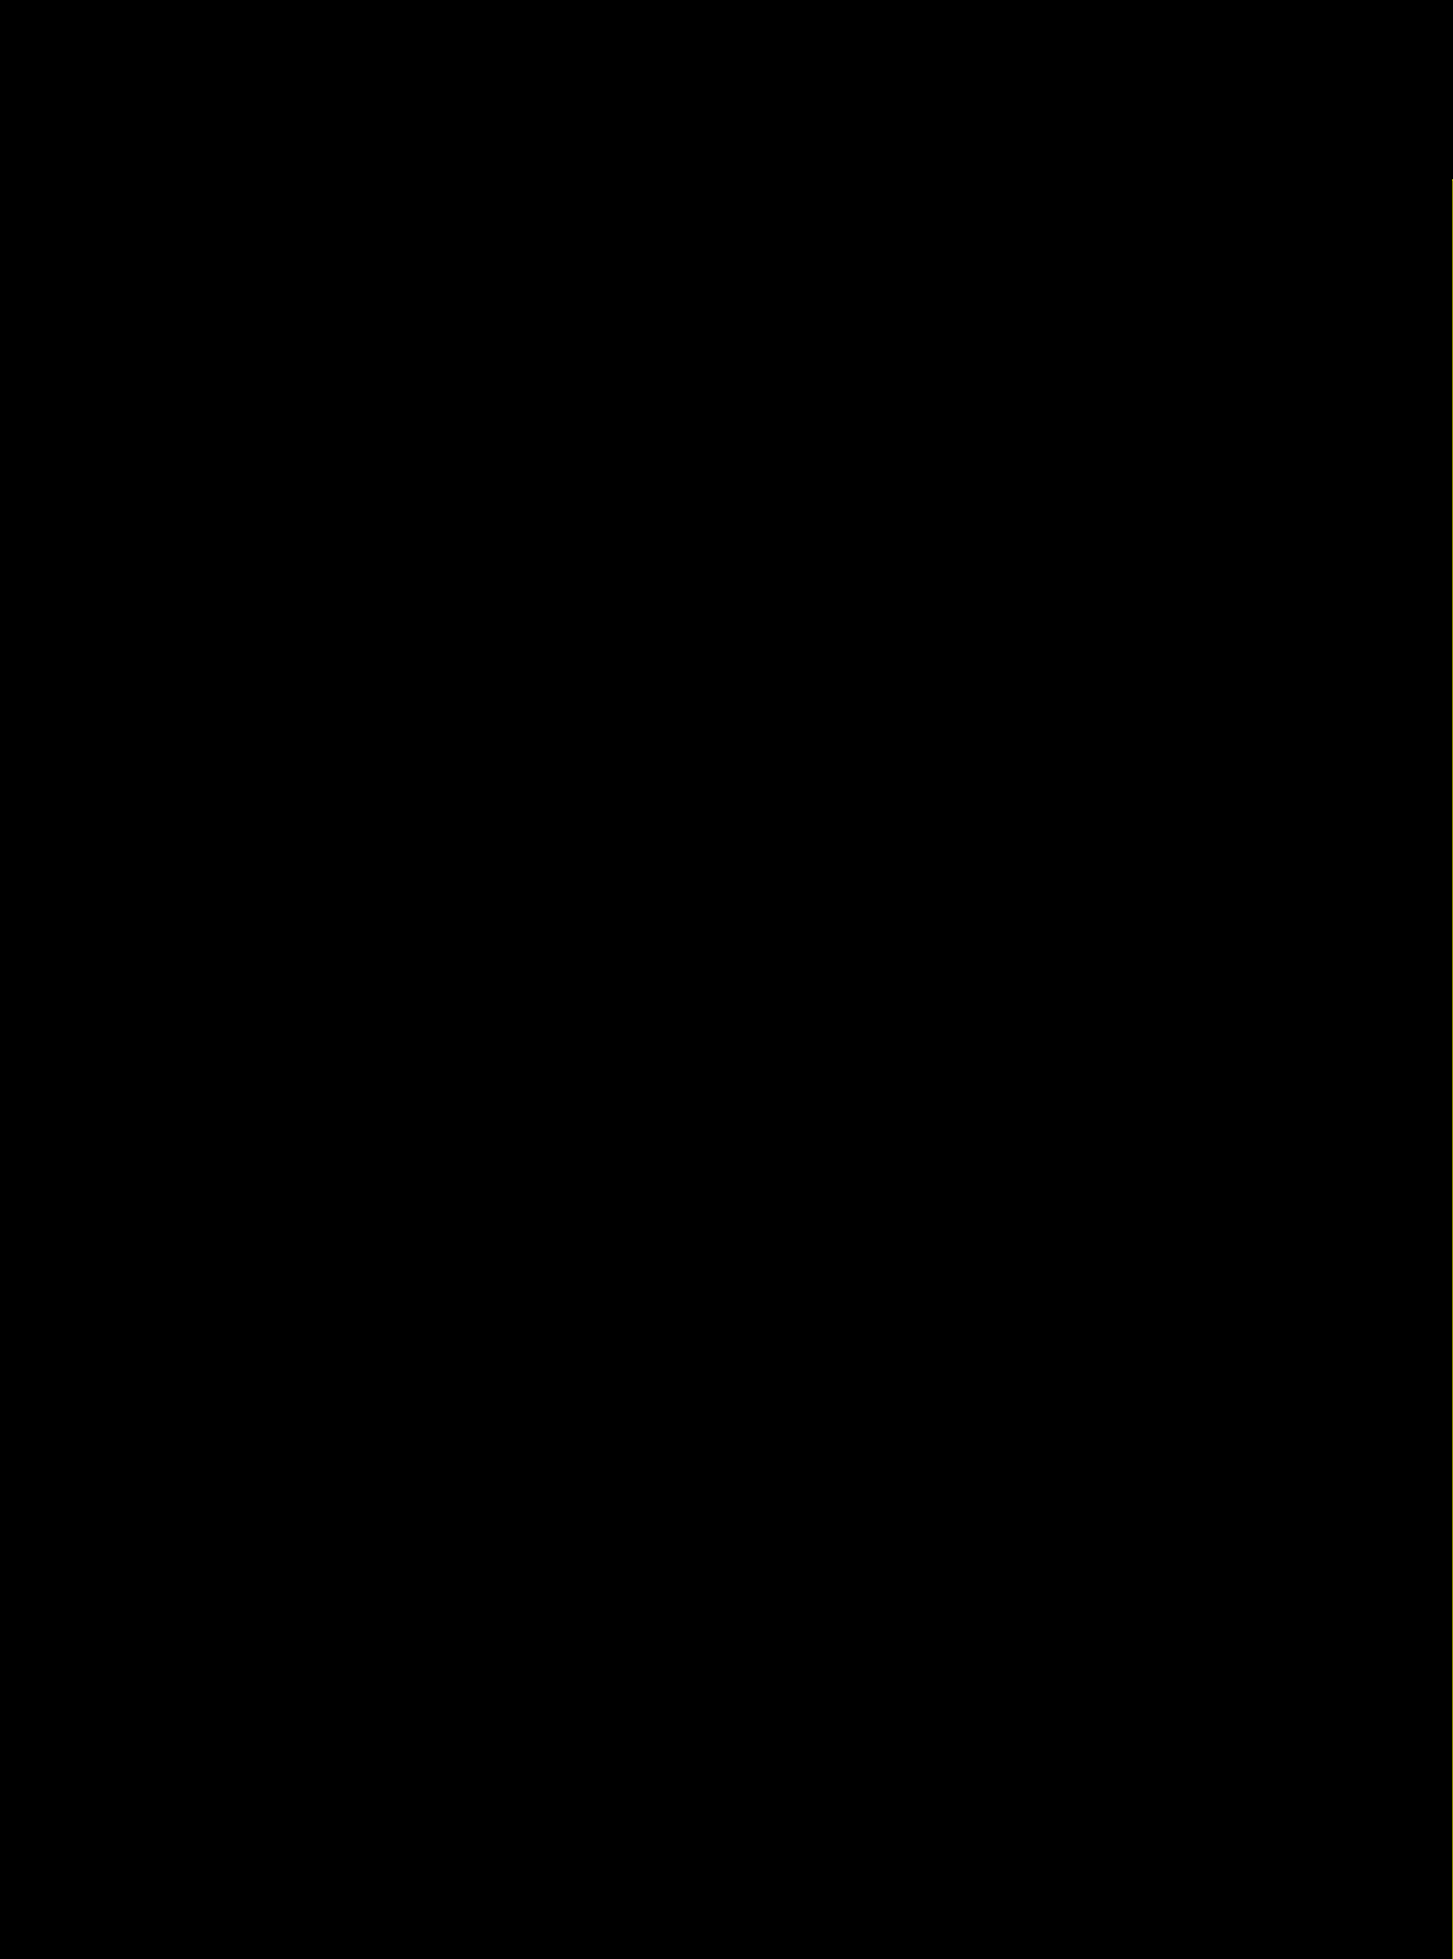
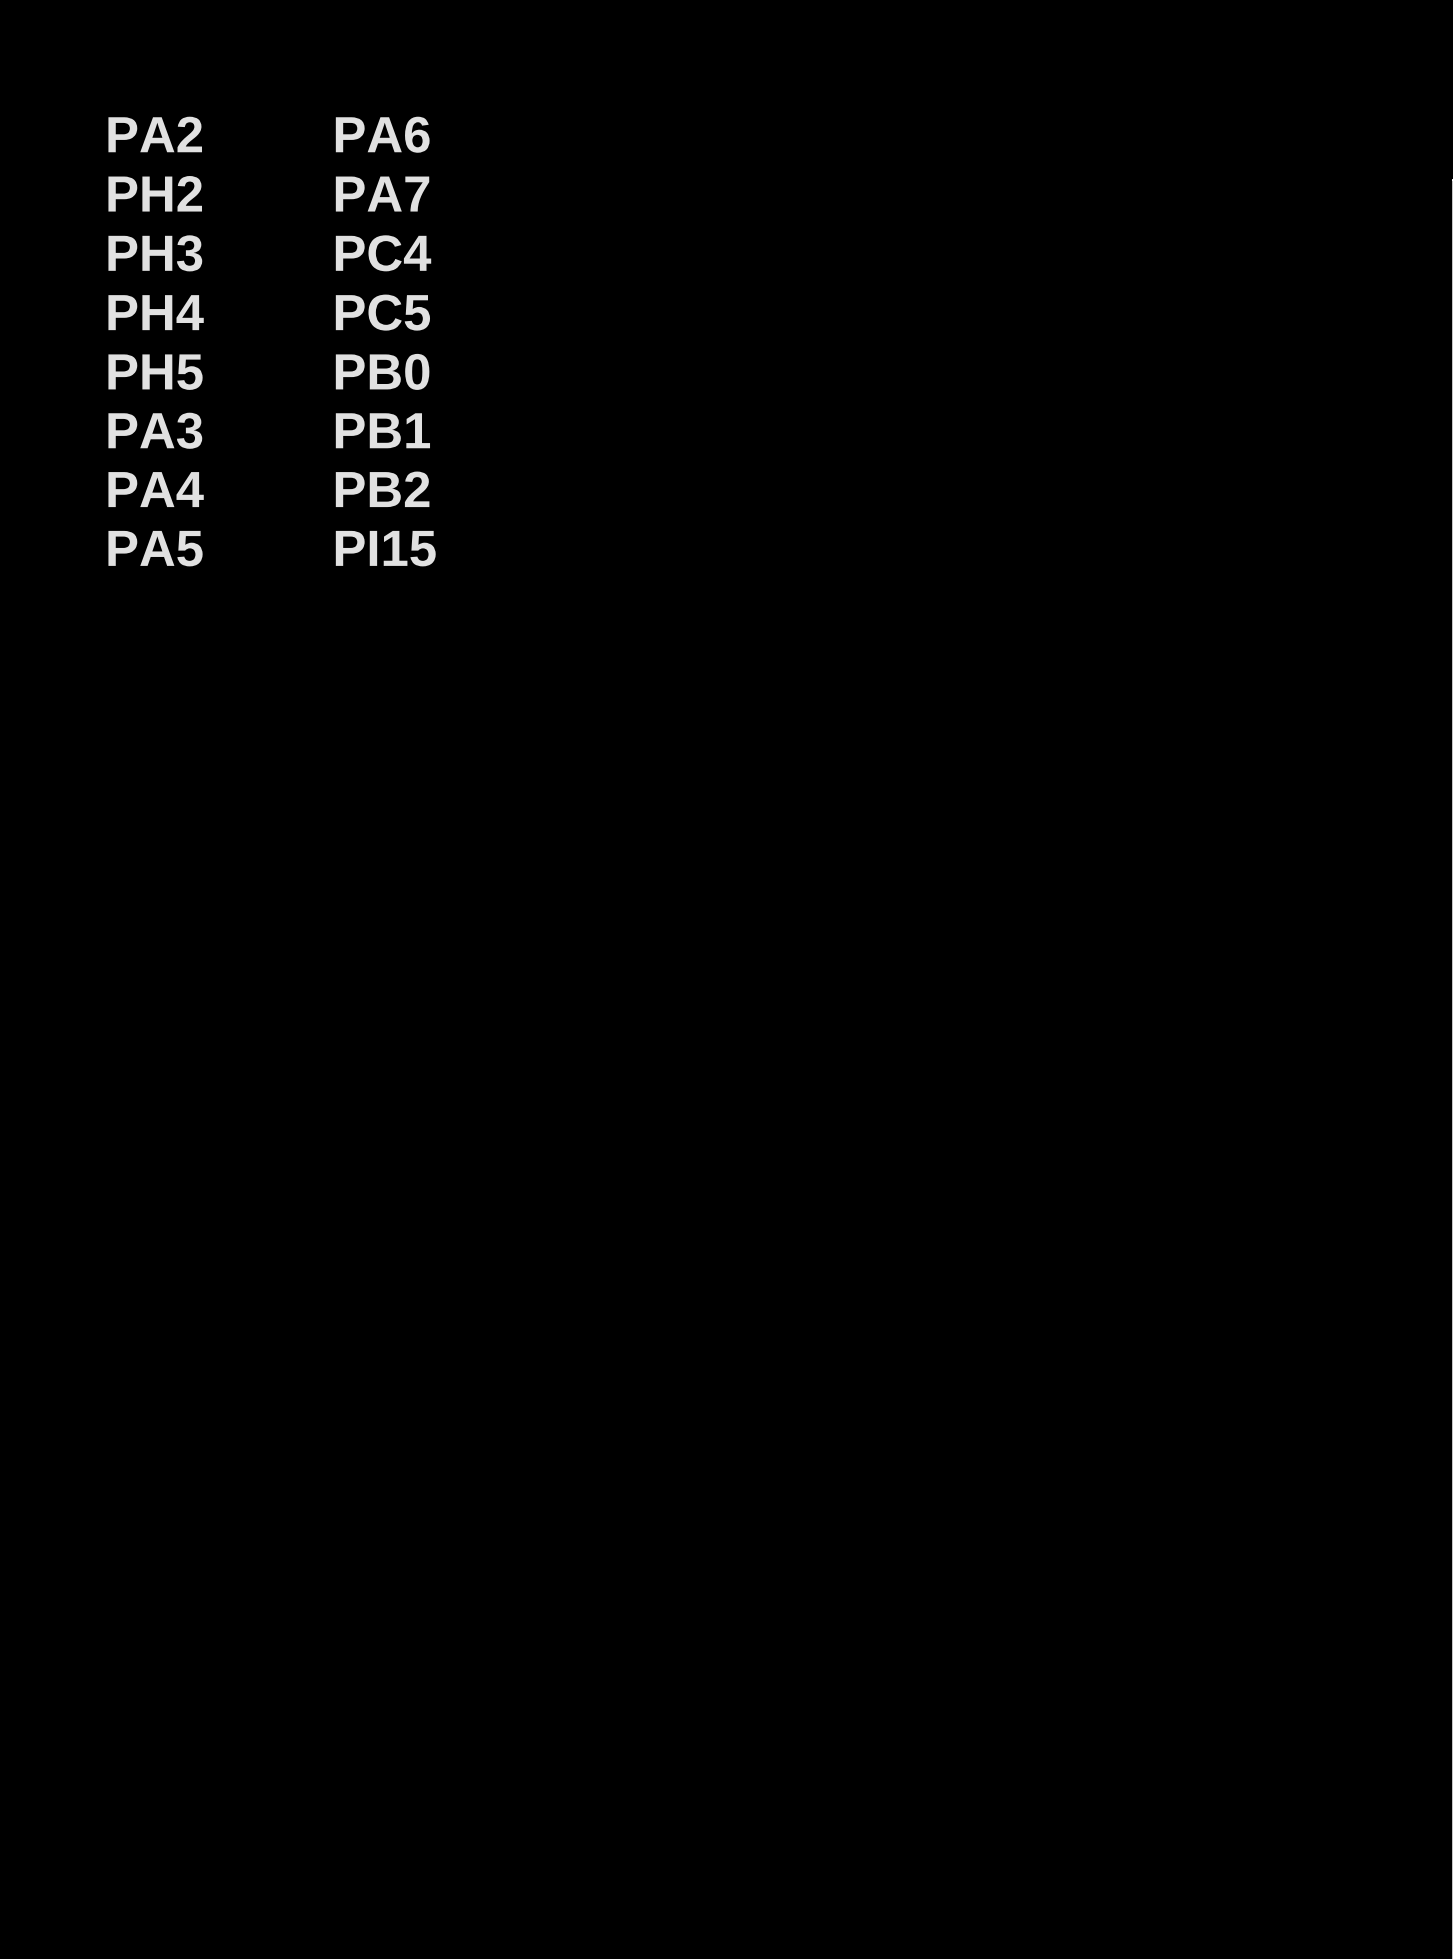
text: none -> PA2 (155, 134)
text: none -> PA6 (382, 134)
text: none -> PH2 (155, 193)
text: none -> PA7 (382, 194)
text: none -> PC4 (383, 253)
text: none -> PH3 (155, 253)
text: none -> PH4 (156, 312)
text: none -> PC5 (382, 312)
text: none -> PH5 (155, 372)
text: none -> PB0 (382, 371)
text: none -> PA3 (155, 430)
text: none -> PB1 (382, 430)
text: none -> PA4 (156, 489)
text: none -> PB2 (382, 489)
text: none -> PA5 (155, 548)
text: none -> PI15 (385, 548)

